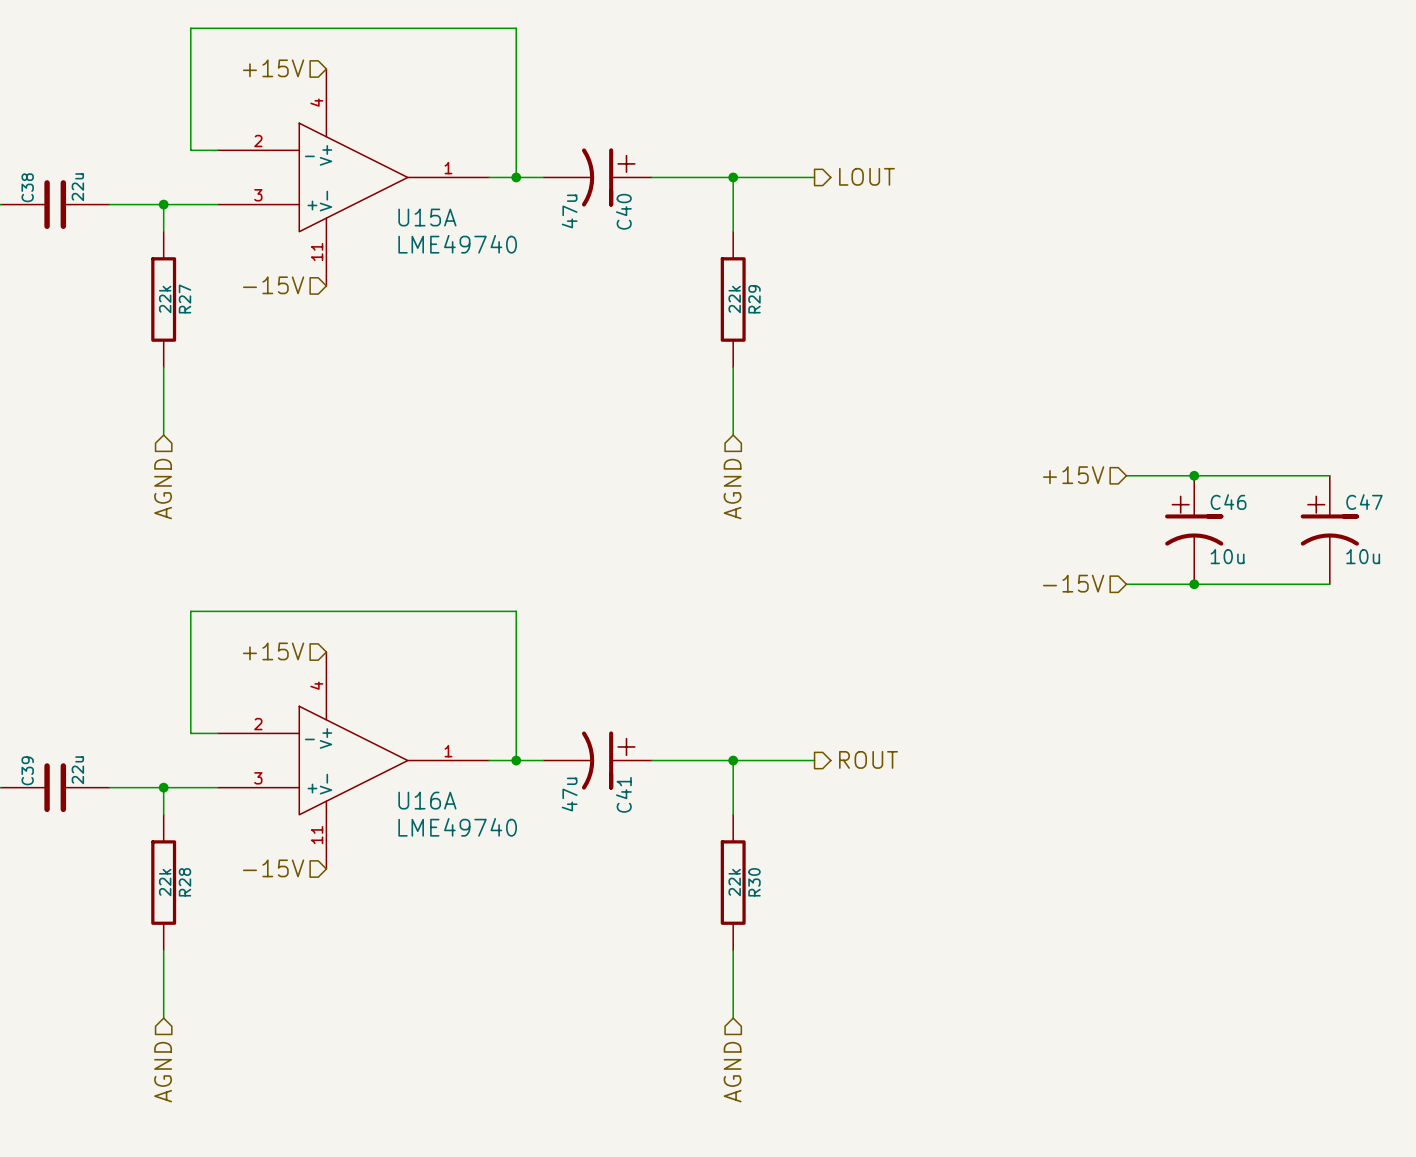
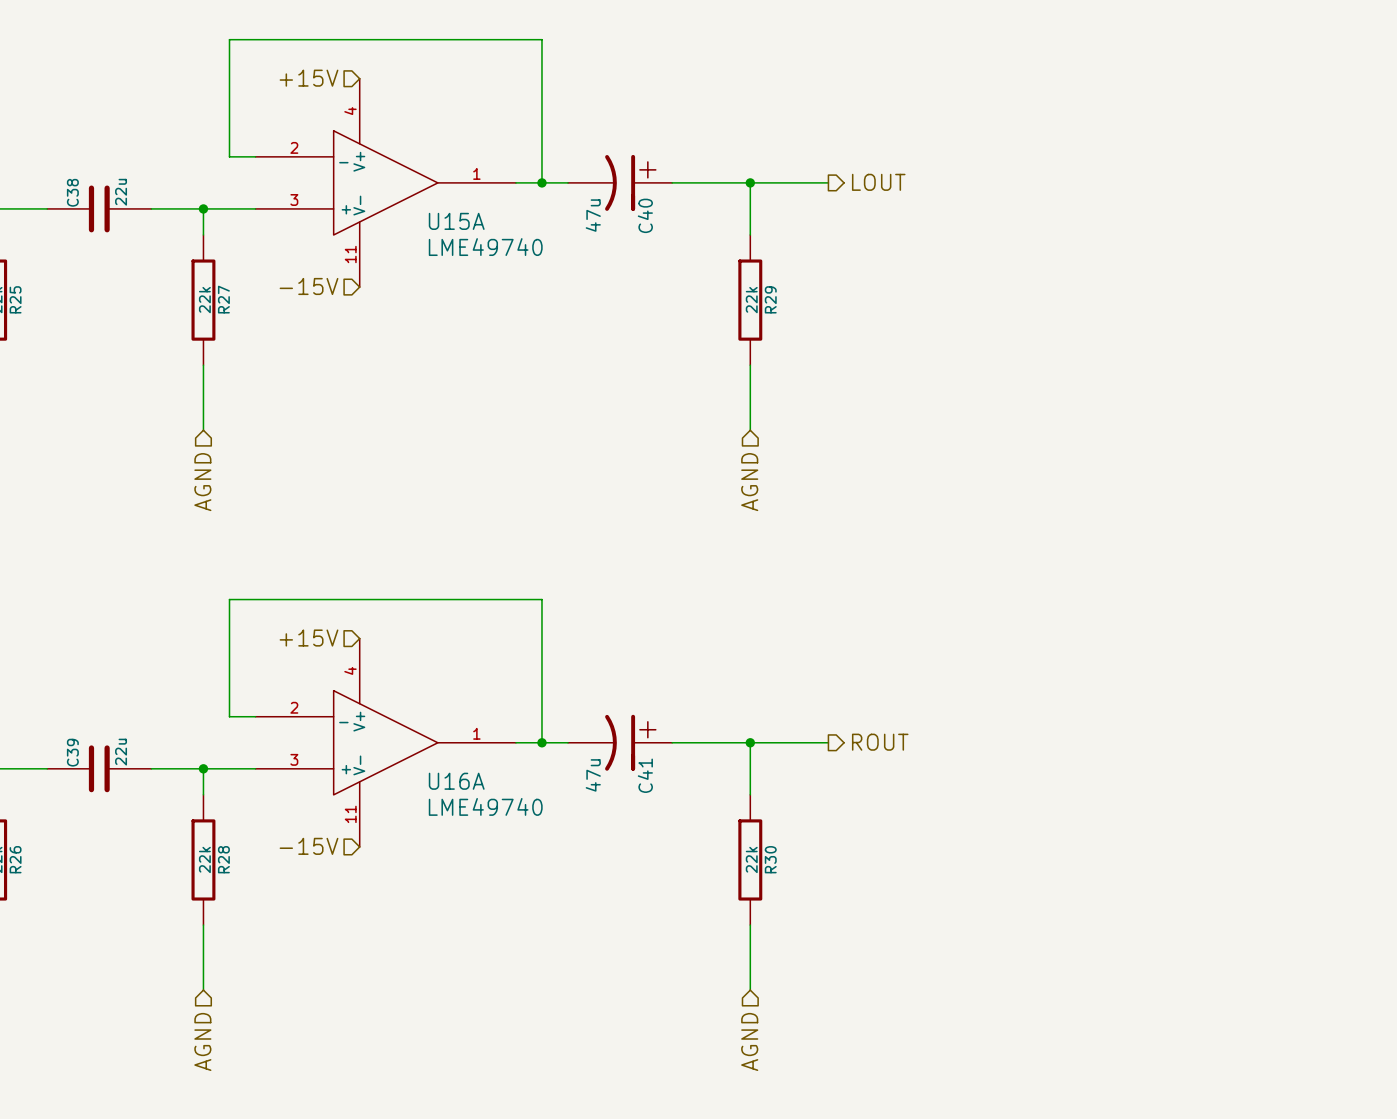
hierarchical label: +15V (1073, 475) -> none
wire: (1126, 475) (1329, 475) -> none
junction: (1194, 475) -> none
C46: 10u (1194, 530) -> none
C47: 10u (1329, 530) -> none
hierarchical label: -15V (1073, 583) -> none
wire: (1126, 584) (1329, 584) -> none
junction: (1194, 584) -> none

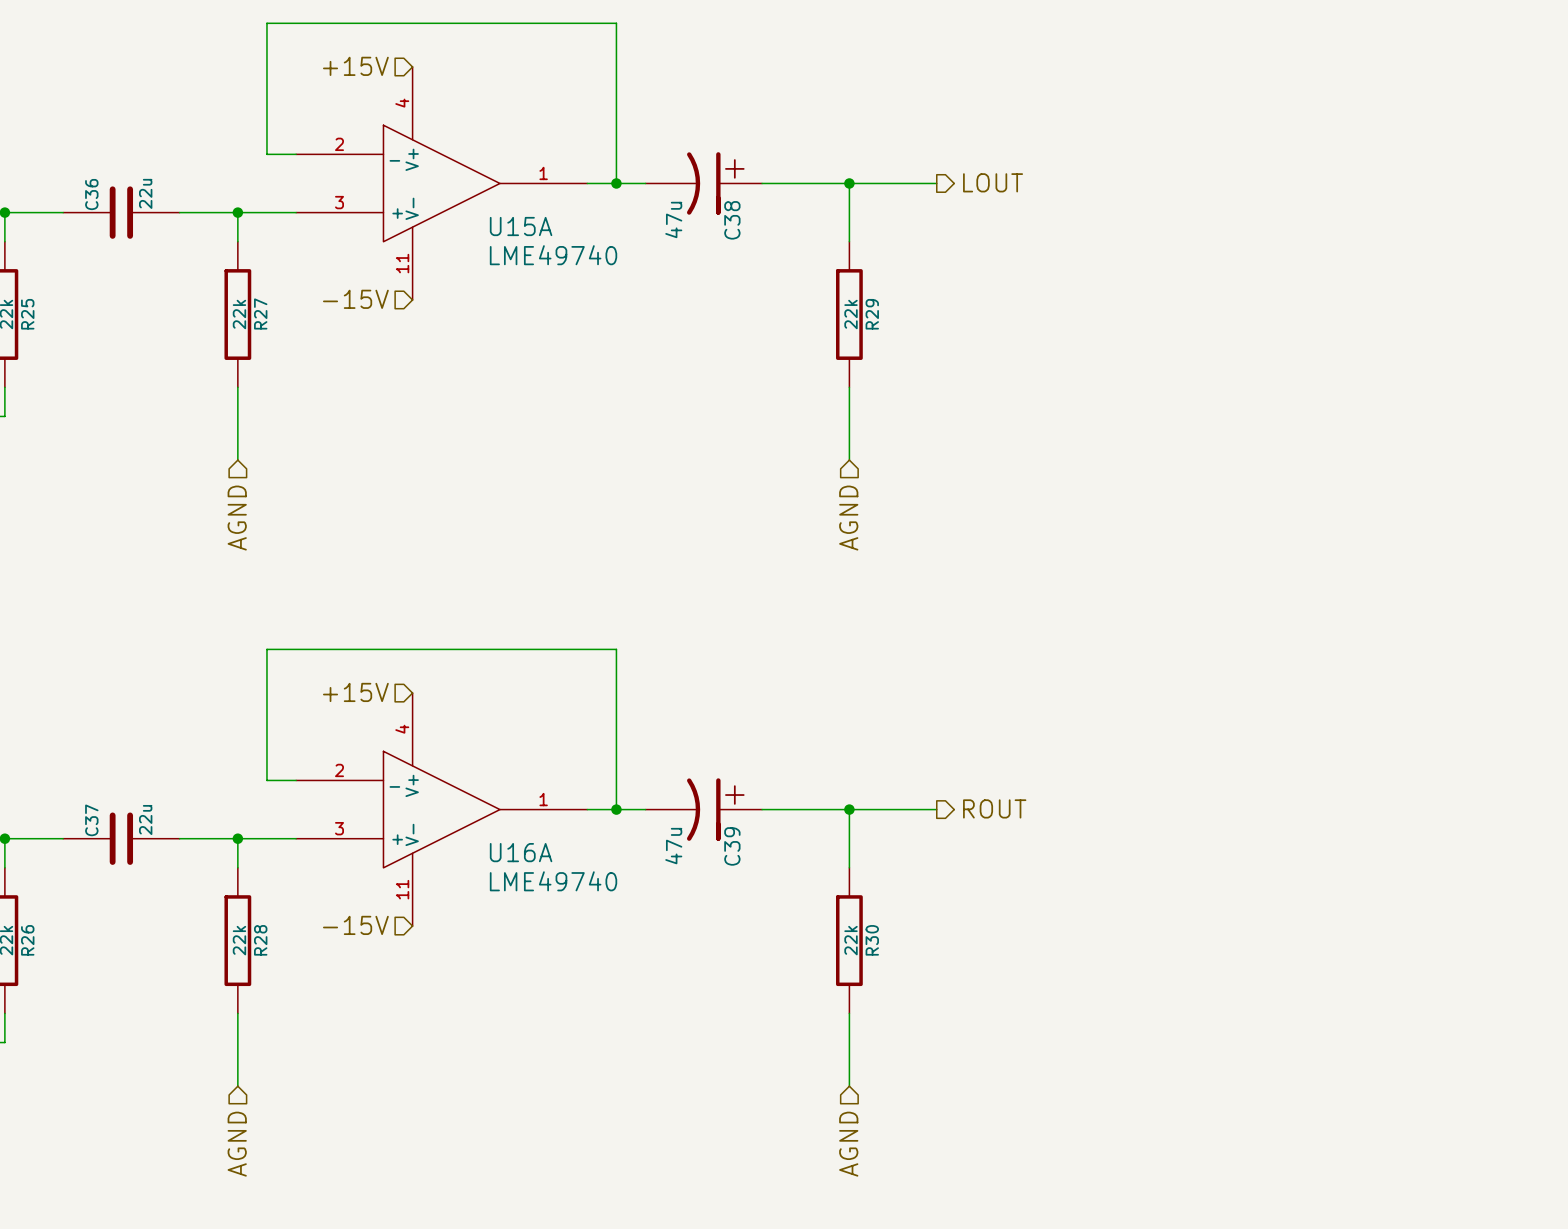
C38 name: C38 (72, 192) -> C36 (91, 194)
C40 name: C40 (645, 215) -> C38 (732, 220)
C39 name: C39 (72, 752) -> C37 (91, 820)
C41 name: C41 (645, 775) -> C39 (732, 846)

